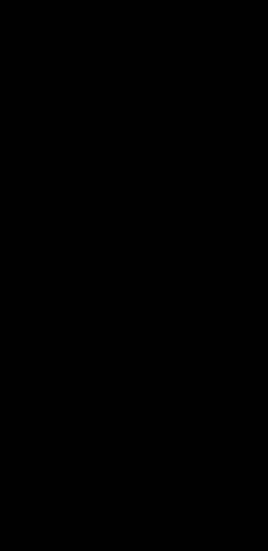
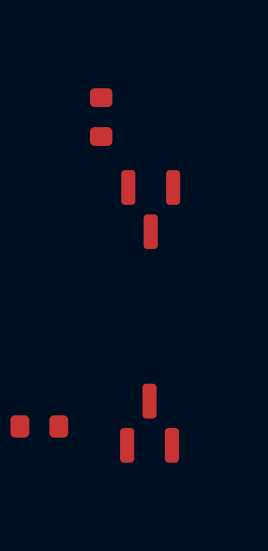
part: none -> (101, 117)
part: none -> (150, 209)
part: none -> (149, 423)
part: none -> (39, 426)

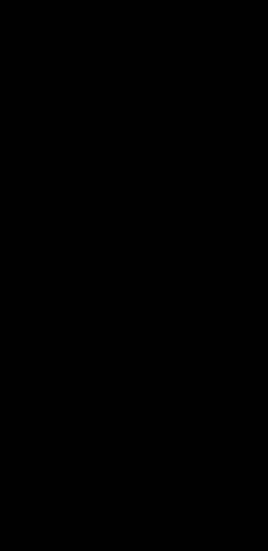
part: (101, 117) -> none
part: (150, 209) -> none
part: (149, 423) -> none
part: (39, 426) -> none

